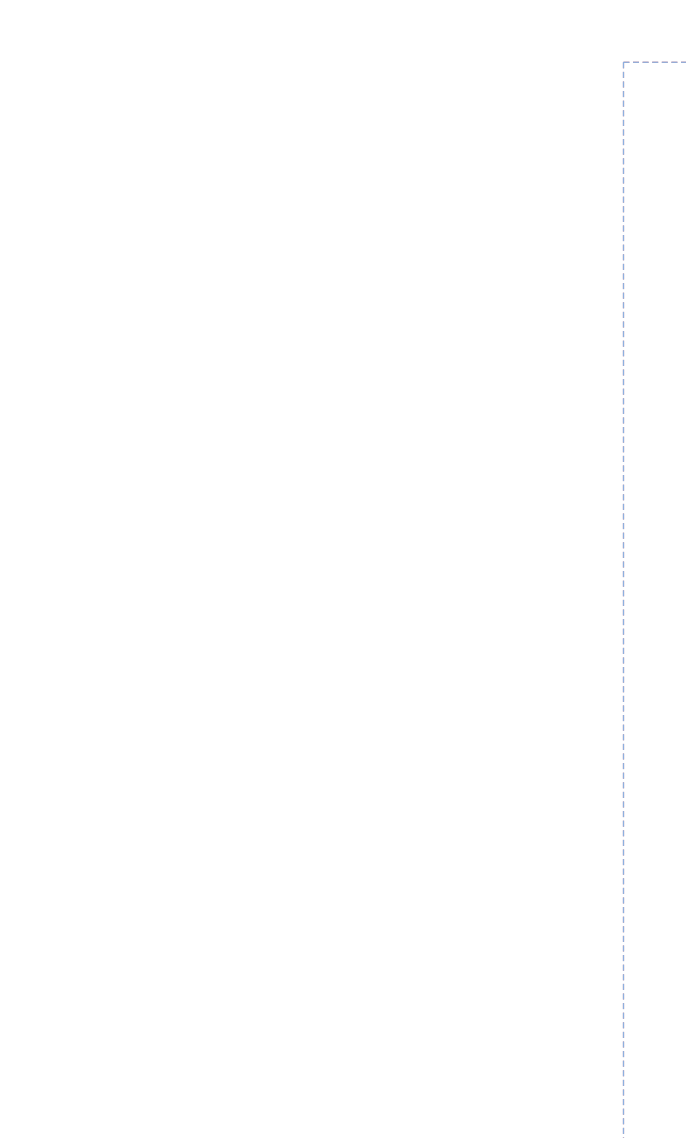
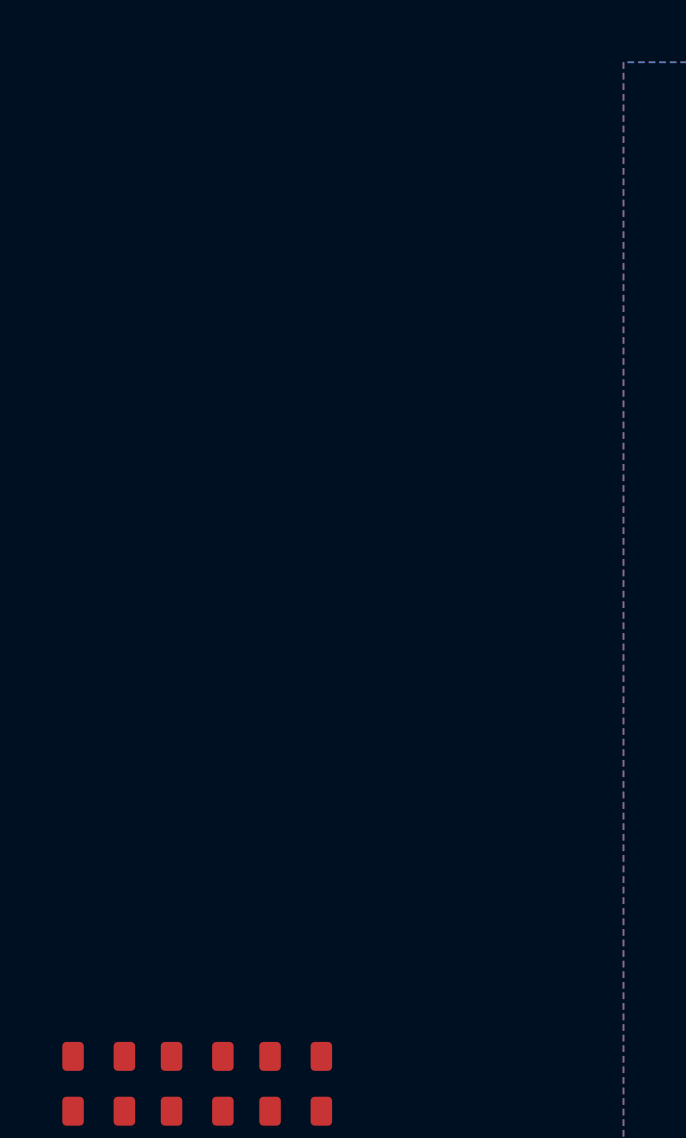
part: none -> (98, 1056)
part: none -> (197, 1056)
part: none -> (295, 1056)
part: none -> (98, 1111)
part: none -> (197, 1111)
part: none -> (295, 1111)

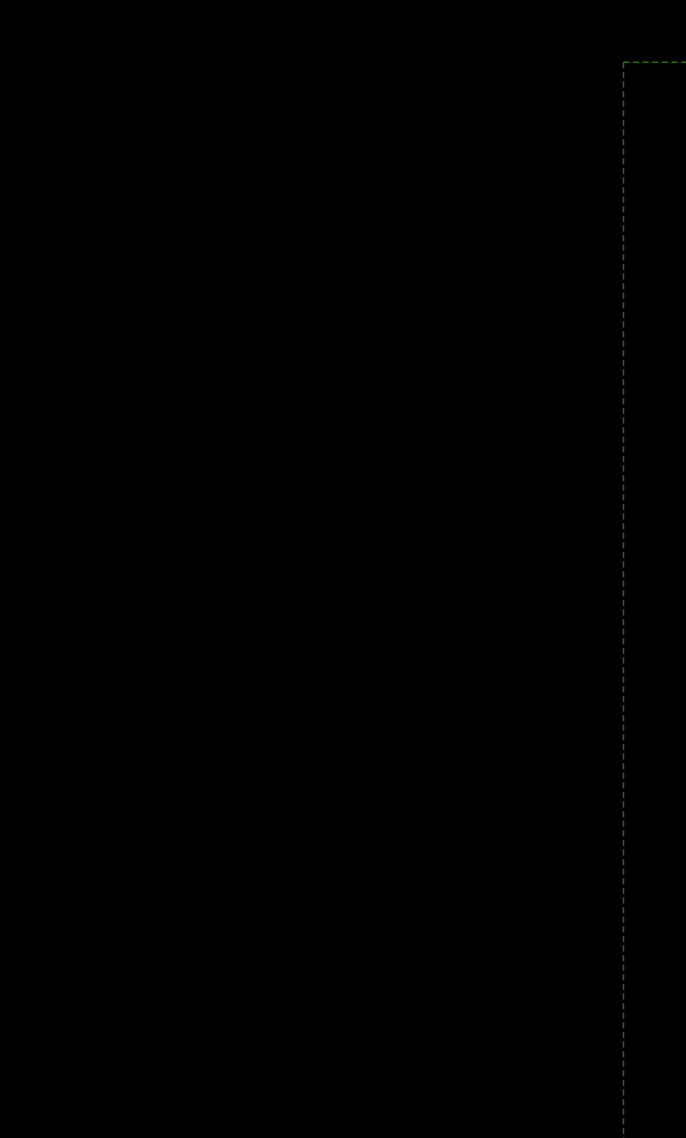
part: (98, 1056) -> none
part: (197, 1056) -> none
part: (295, 1056) -> none
part: (98, 1111) -> none
part: (197, 1111) -> none
part: (295, 1111) -> none

